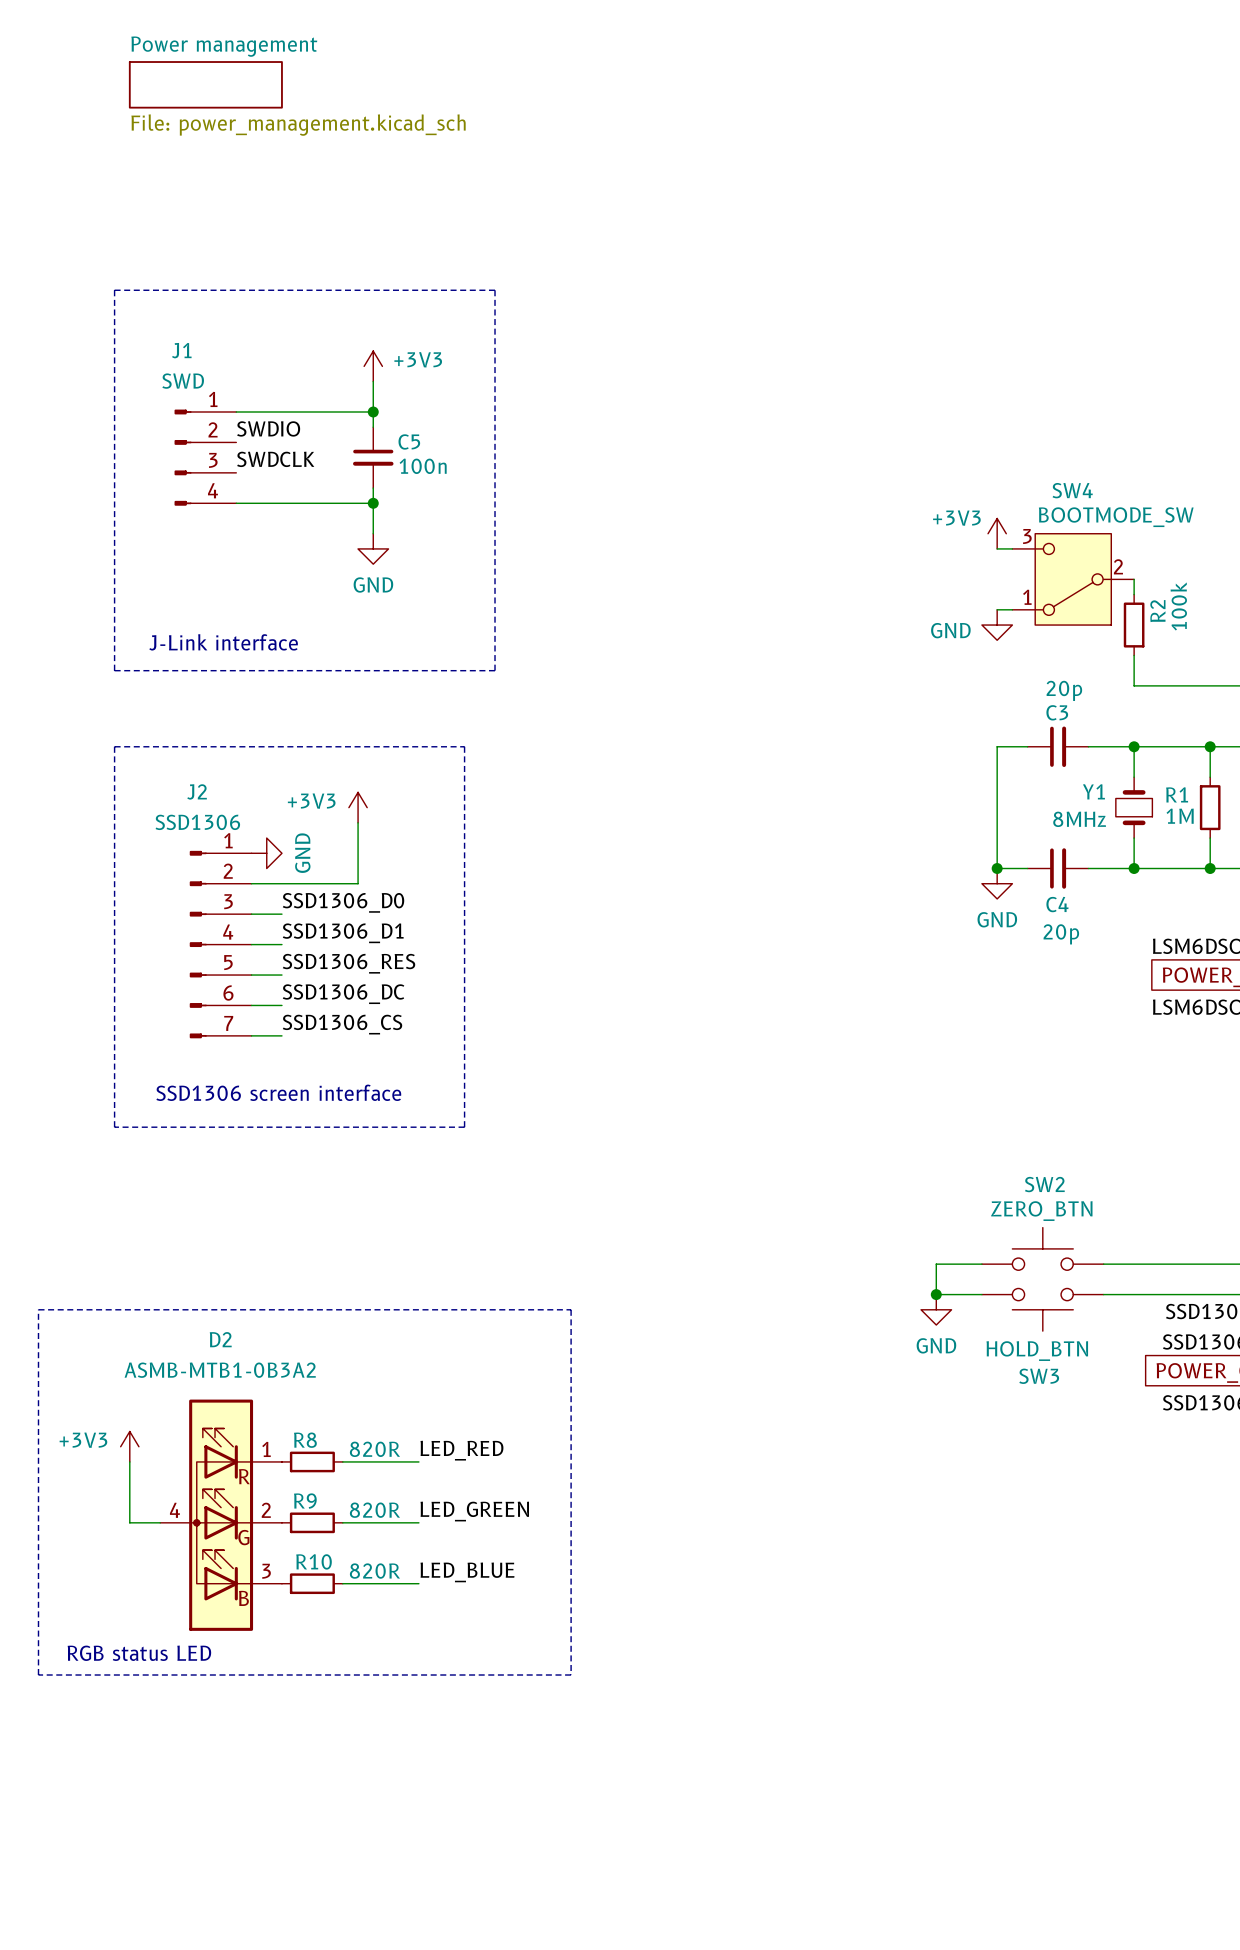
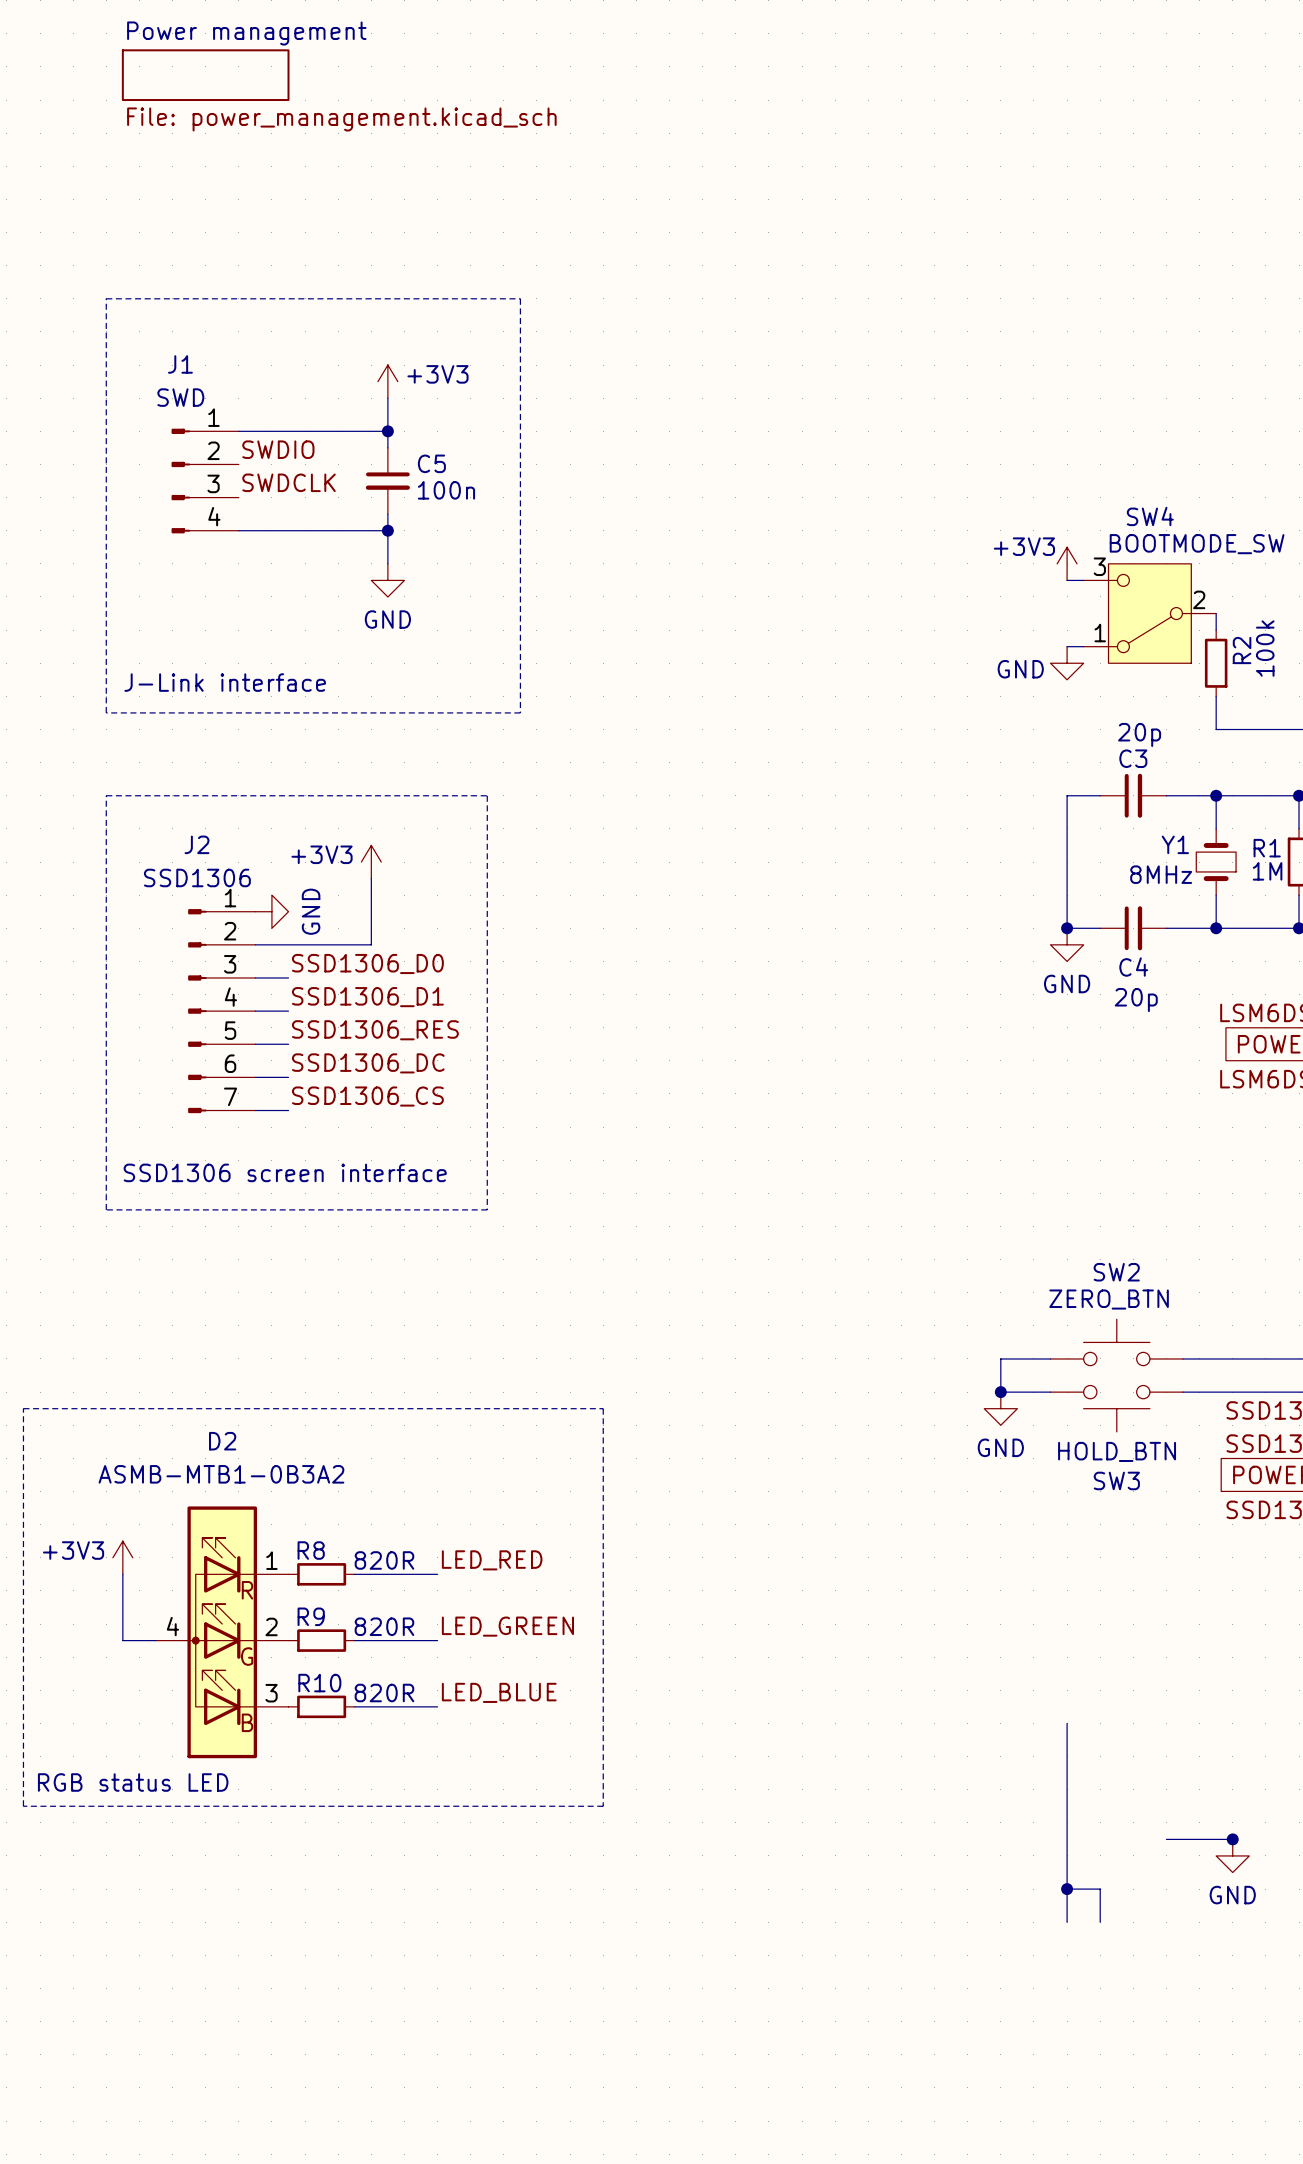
wire: none -> (1067, 1723) (1067, 1922)
wire: none -> (1166, 1839) (1232, 1839)
junction: none -> (1232, 1839)
power symbol: none -> GND (1232, 1855)
wire: none -> (1067, 1889) (1100, 1889) (1100, 1922)
junction: none -> (1067, 1889)

